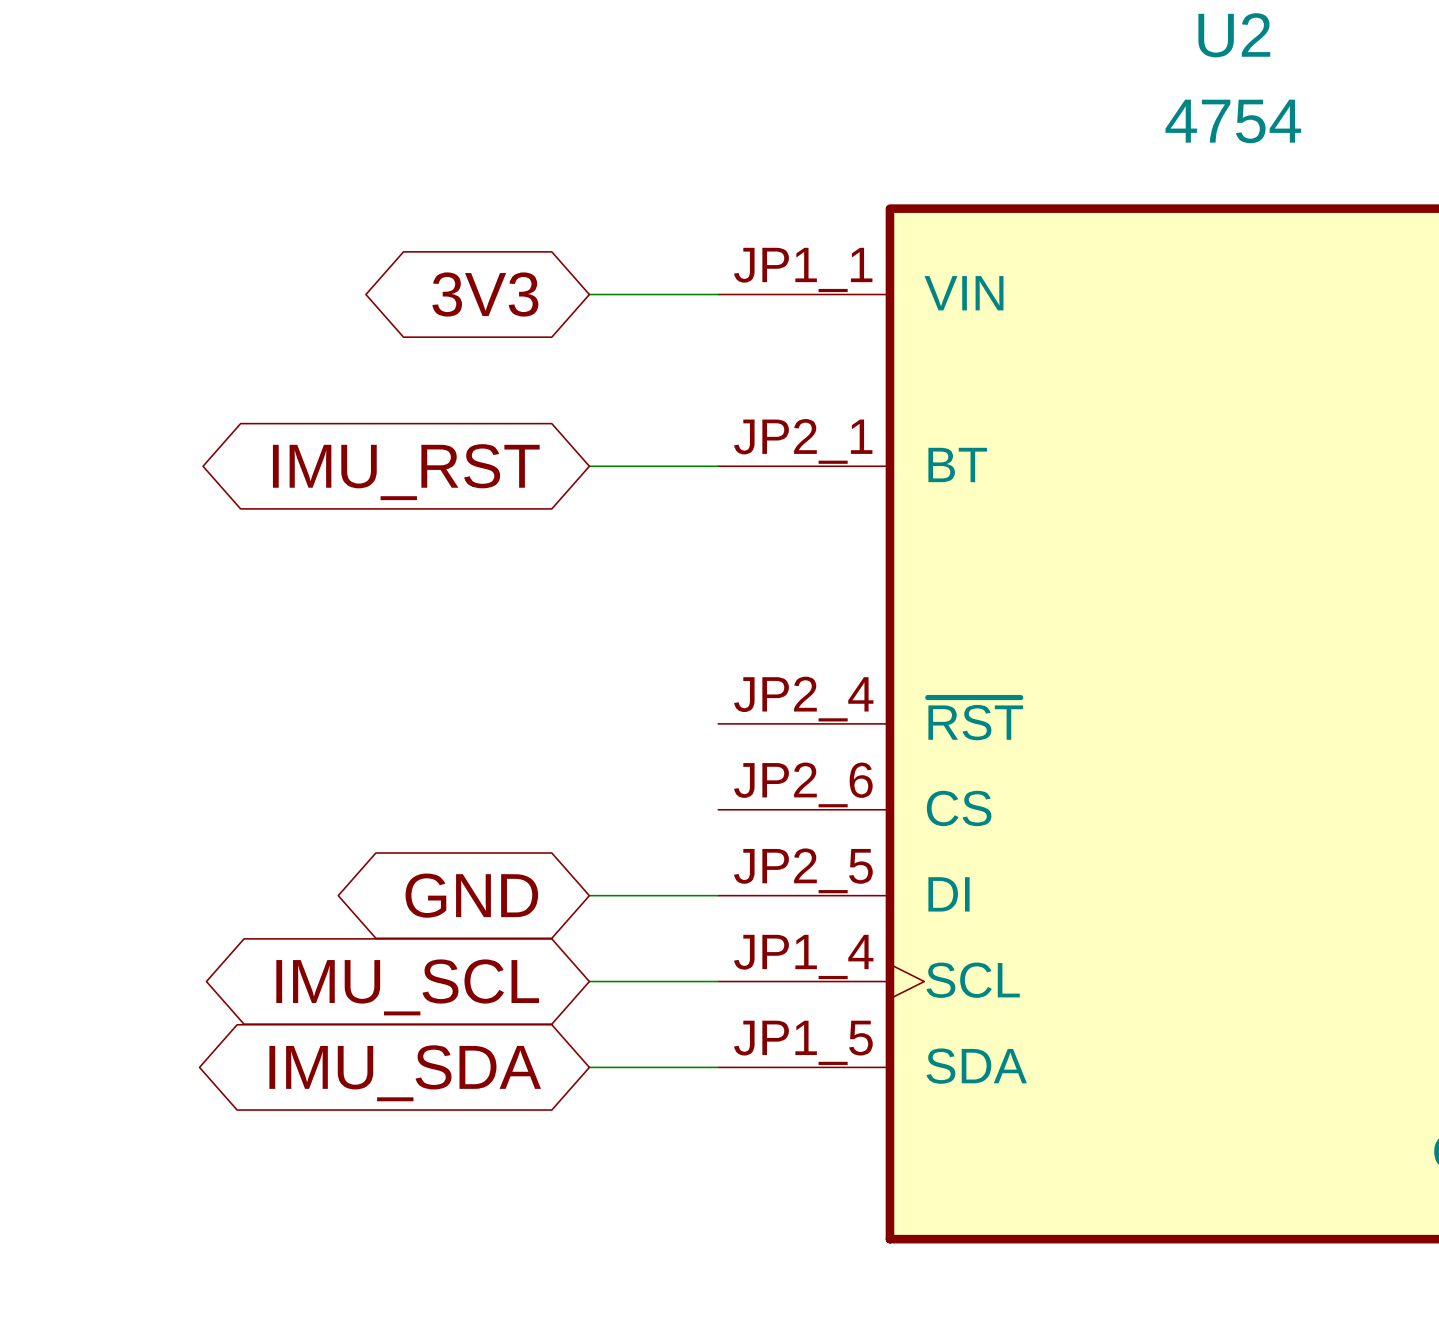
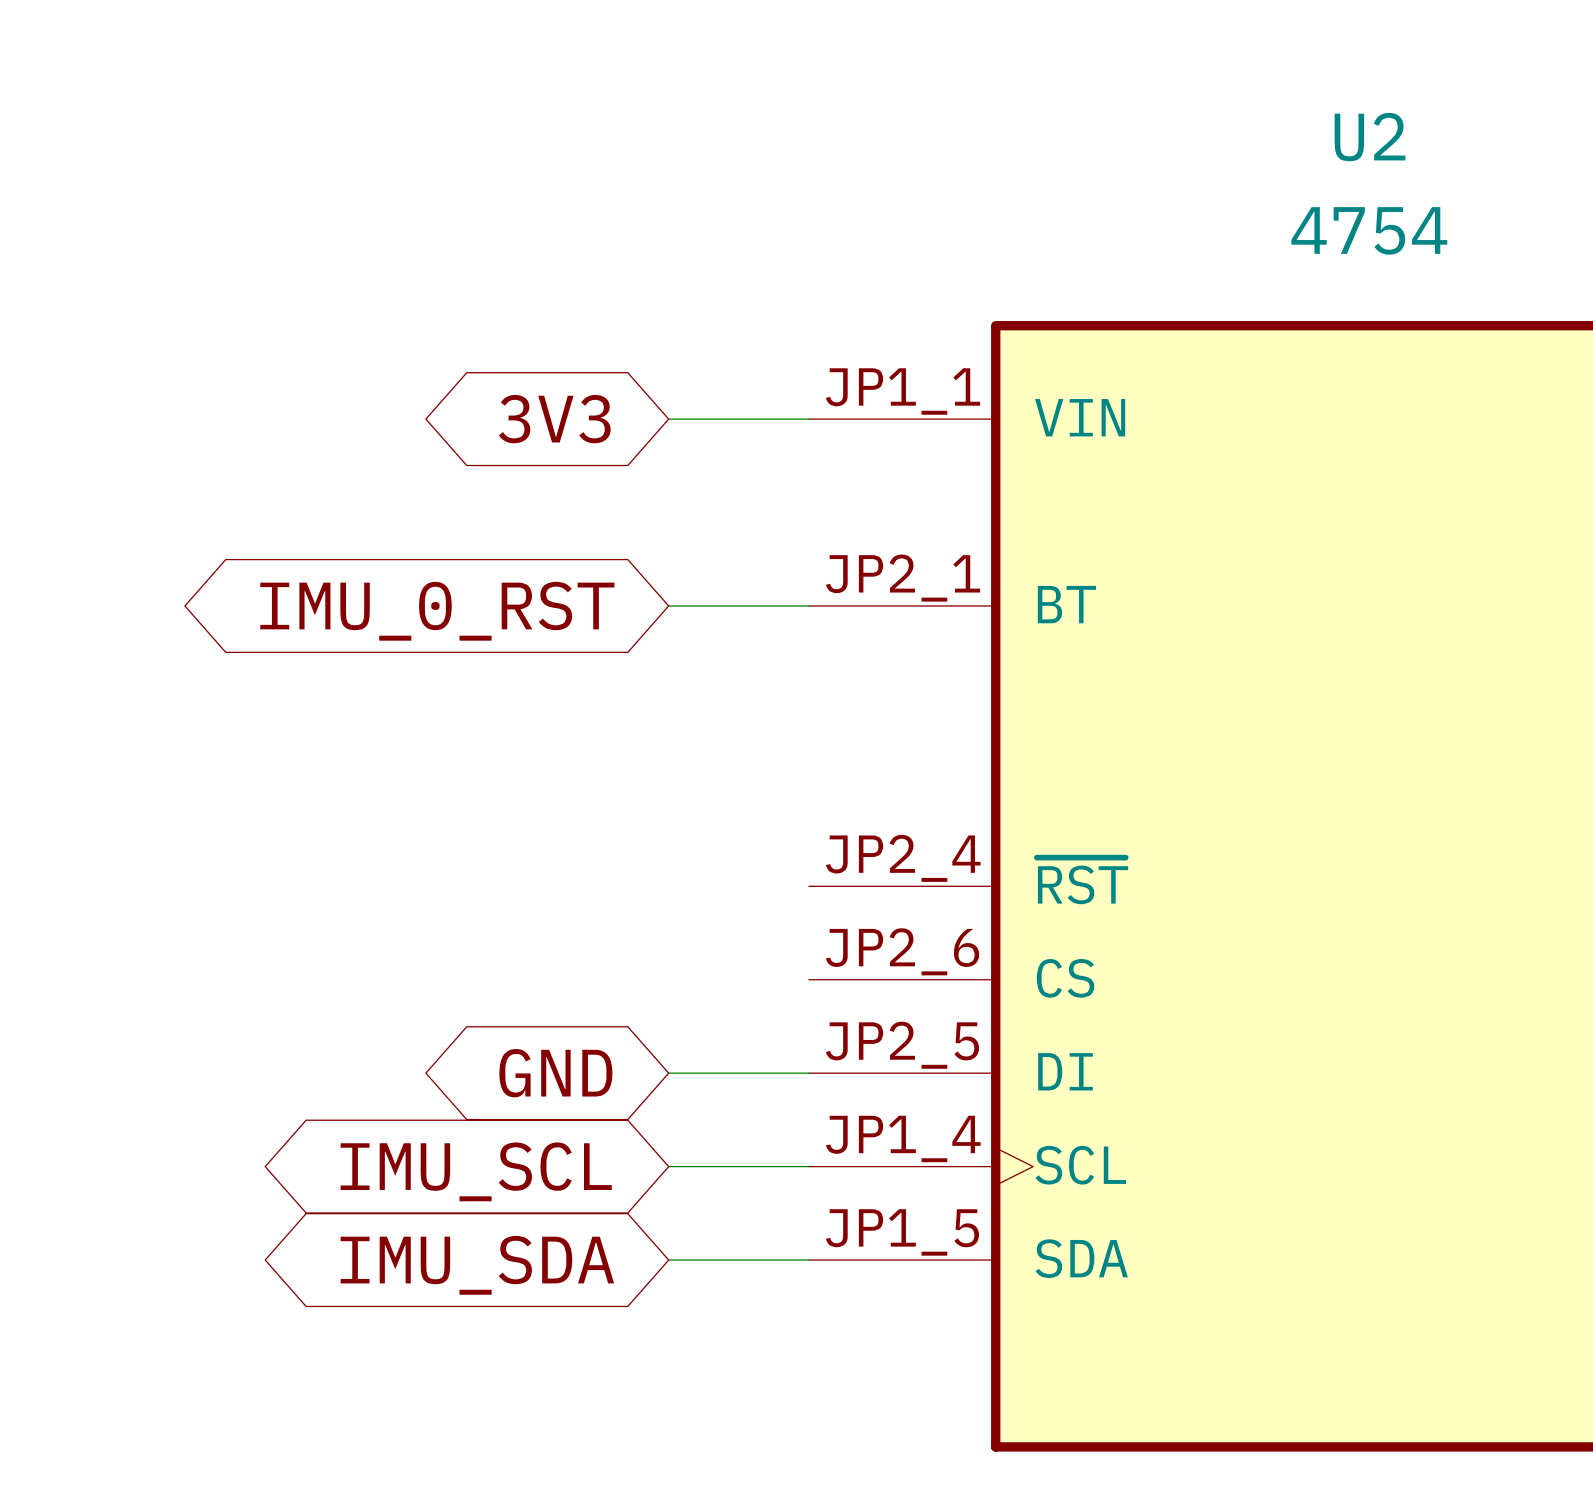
global label: IMU_RST (406, 472) -> IMU_0_RST (437, 611)

